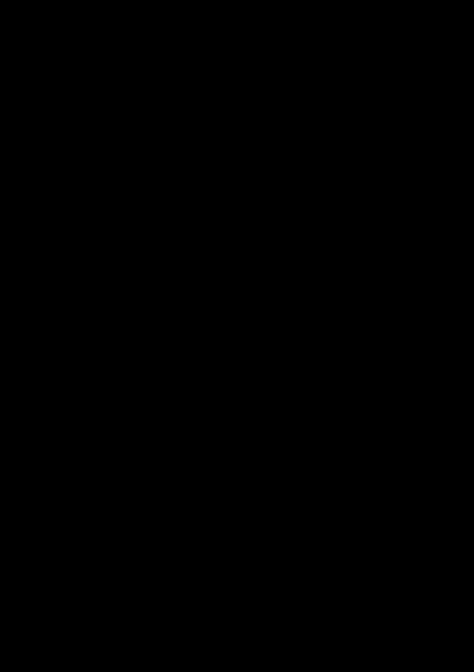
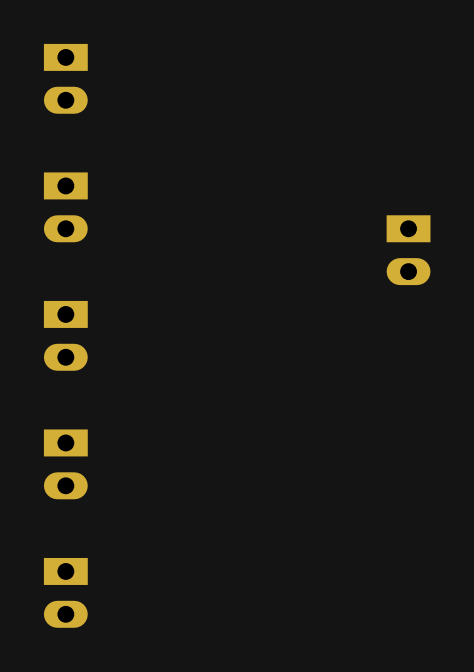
part: none -> (65, 78)
part: none -> (65, 207)
part: none -> (408, 250)
part: none -> (65, 335)
part: none -> (65, 464)
part: none -> (65, 592)

